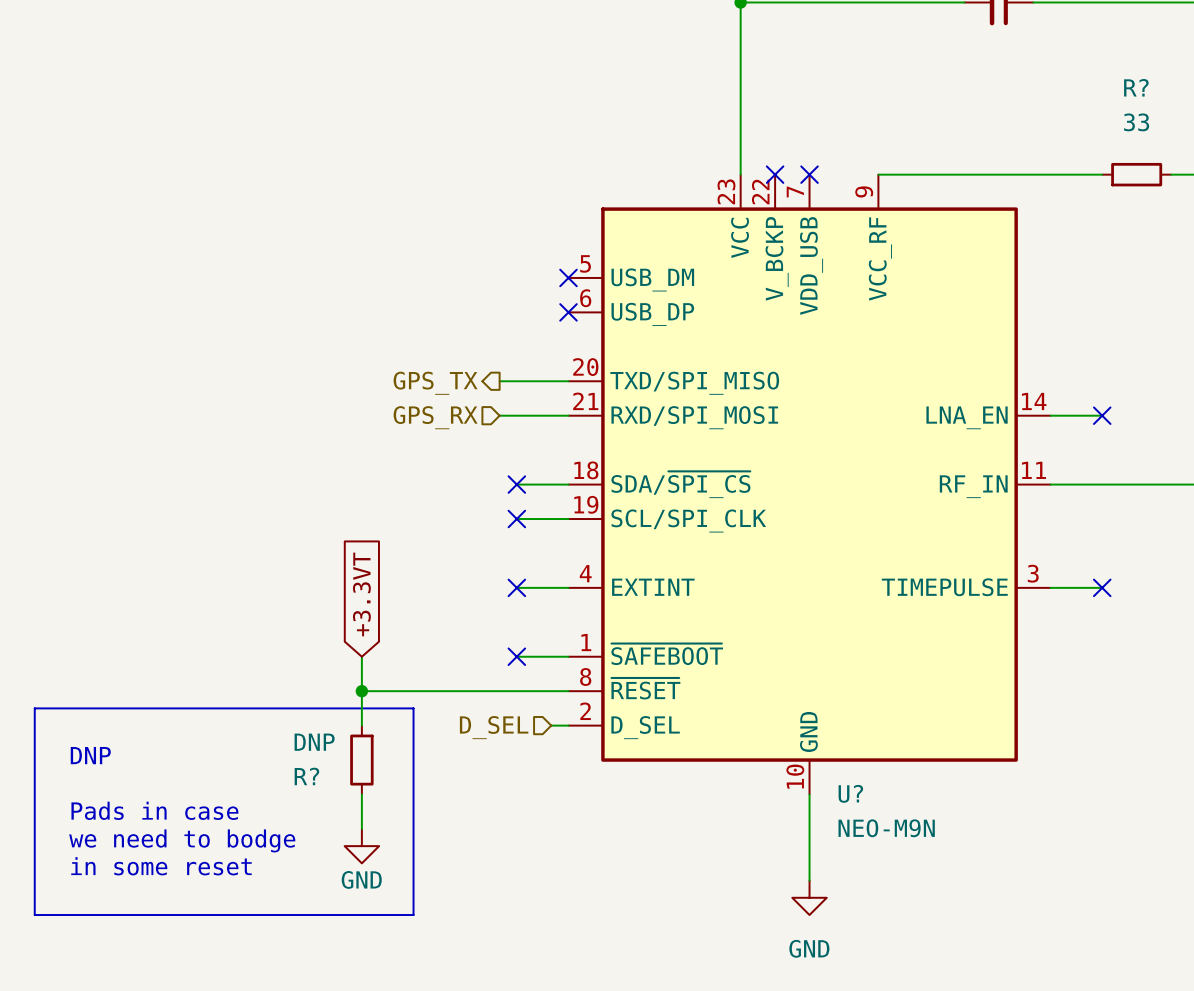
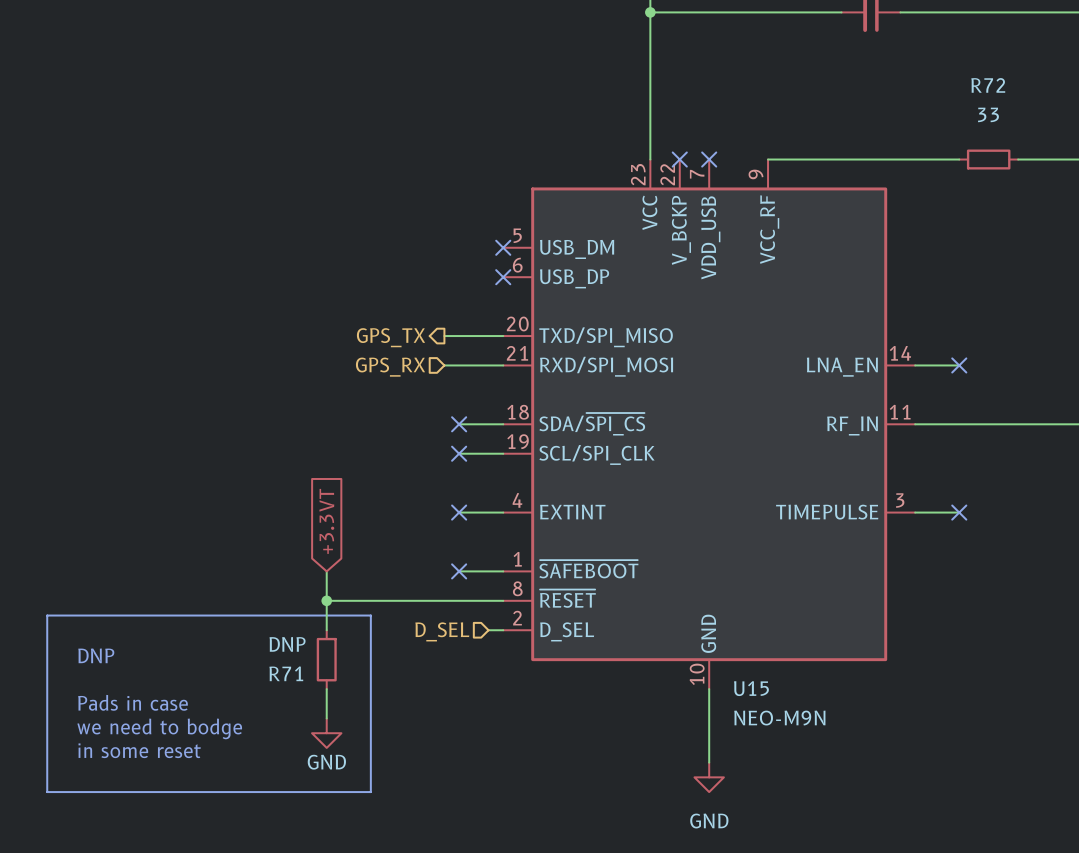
R? name: R? (1136, 87) -> R72 (988, 85)
R? name: R? (306, 776) -> R71 (286, 673)
U? name: U? (850, 793) -> U15 (751, 688)

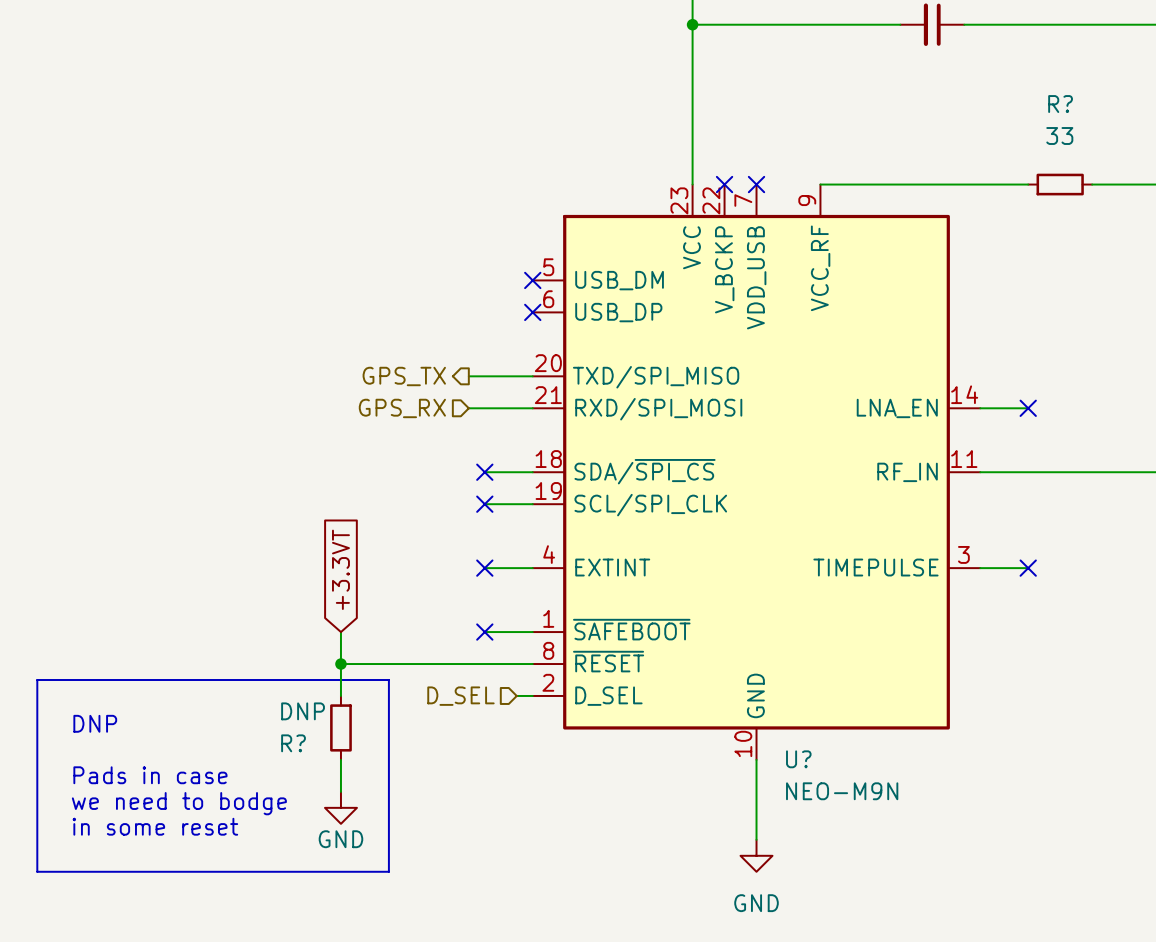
R72 name: R72 (988, 85) -> R? (1060, 104)
R71 name: R71 (286, 673) -> R? (293, 743)
U15 name: U15 (751, 688) -> U? (798, 759)

